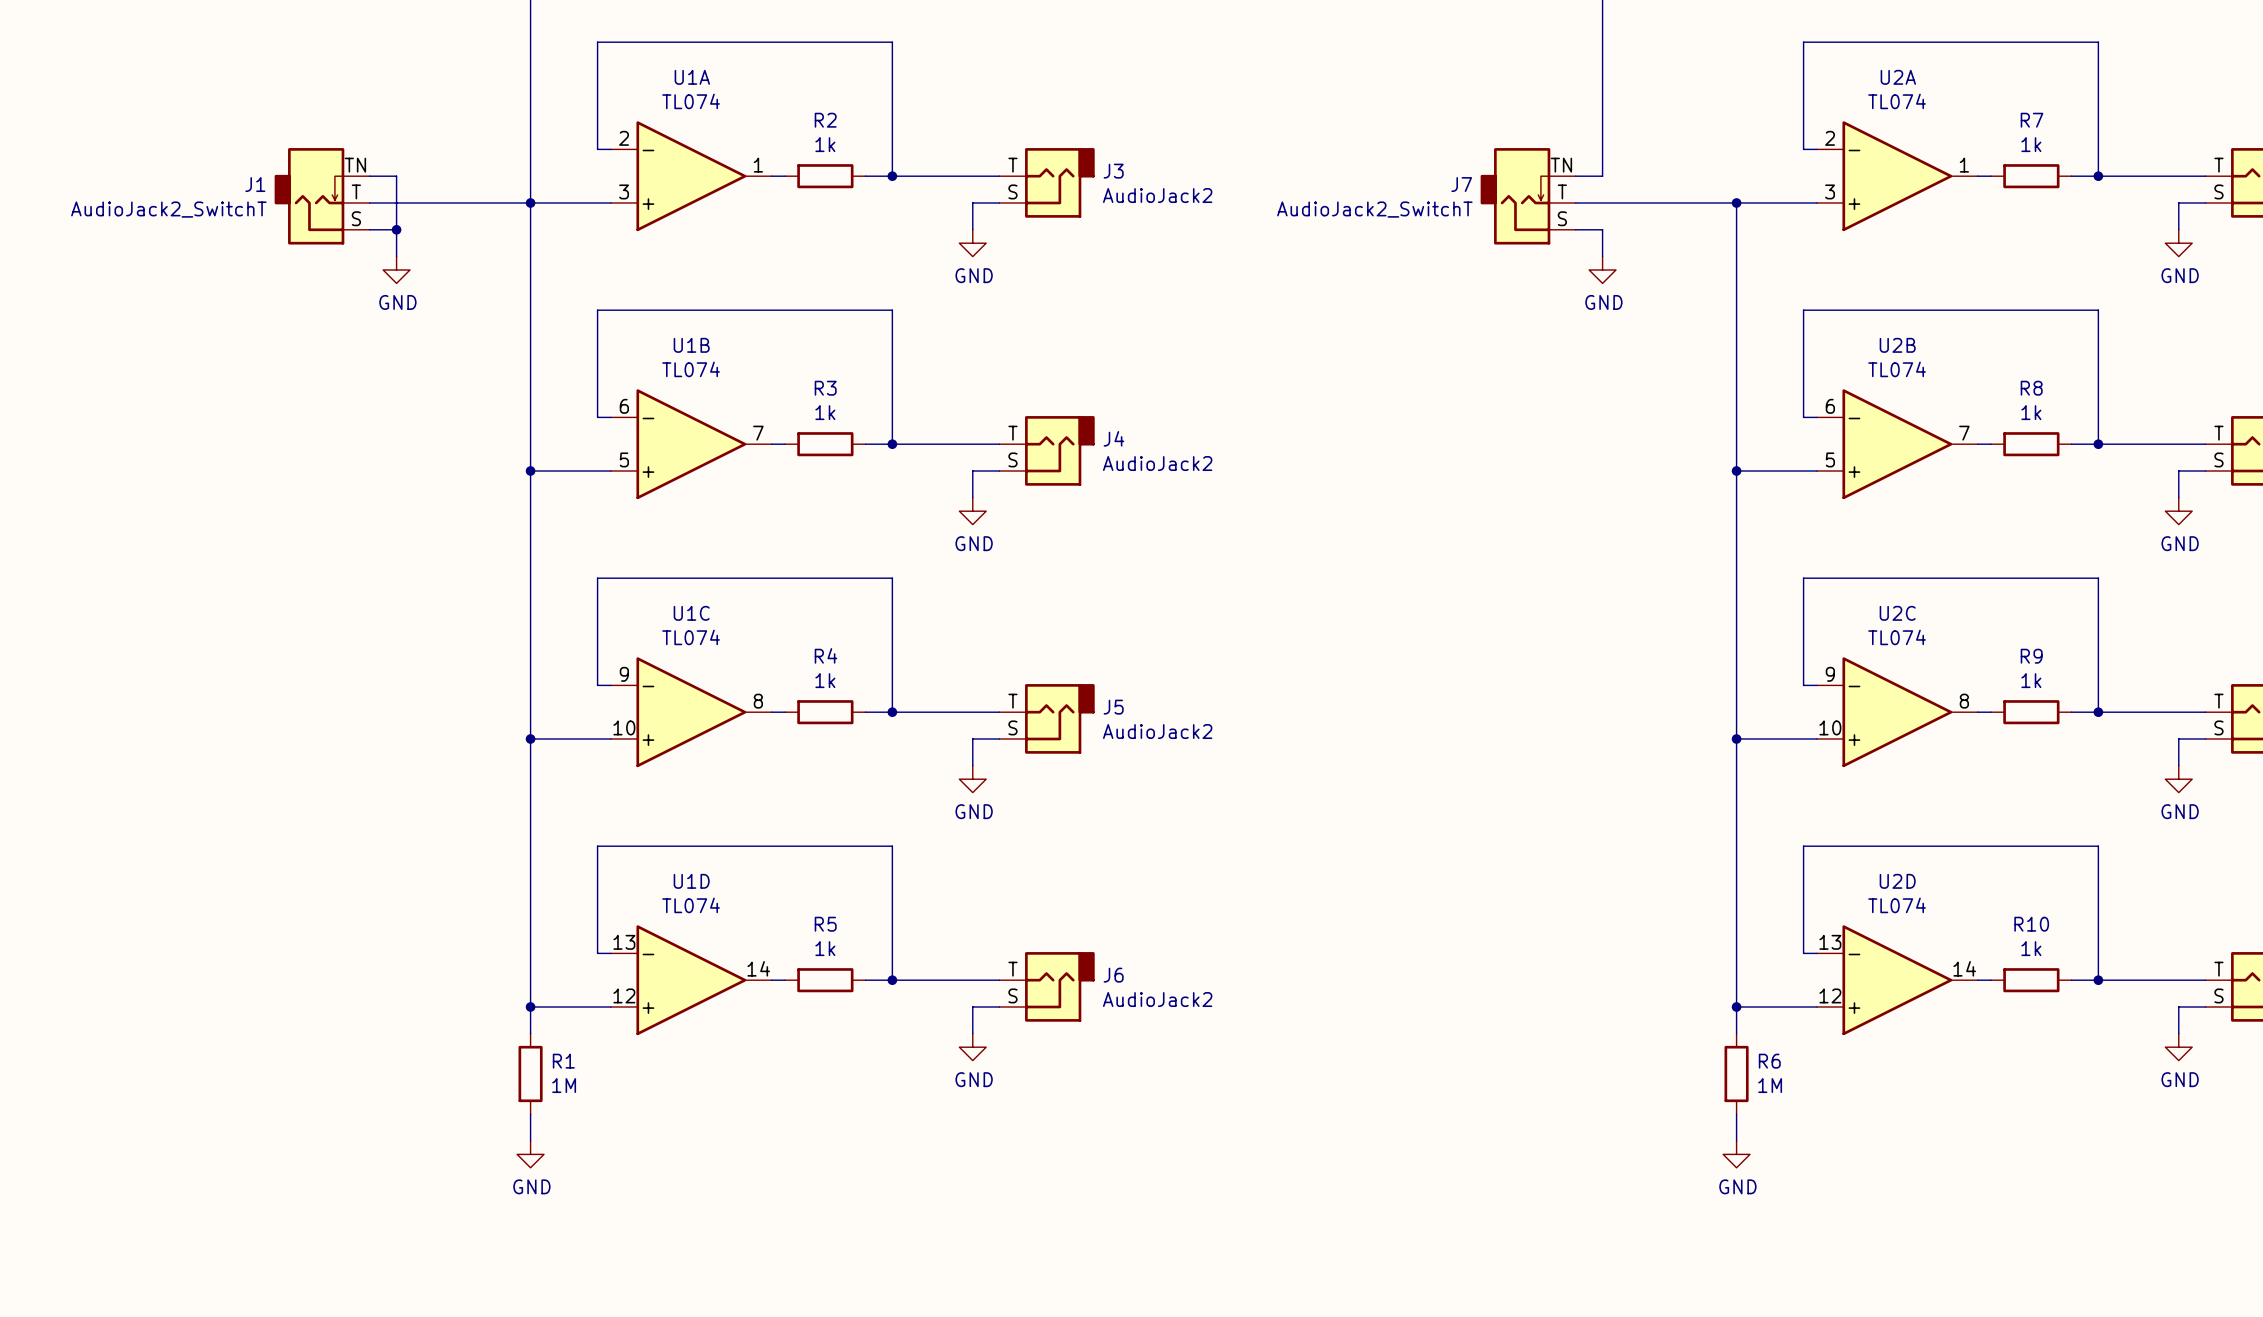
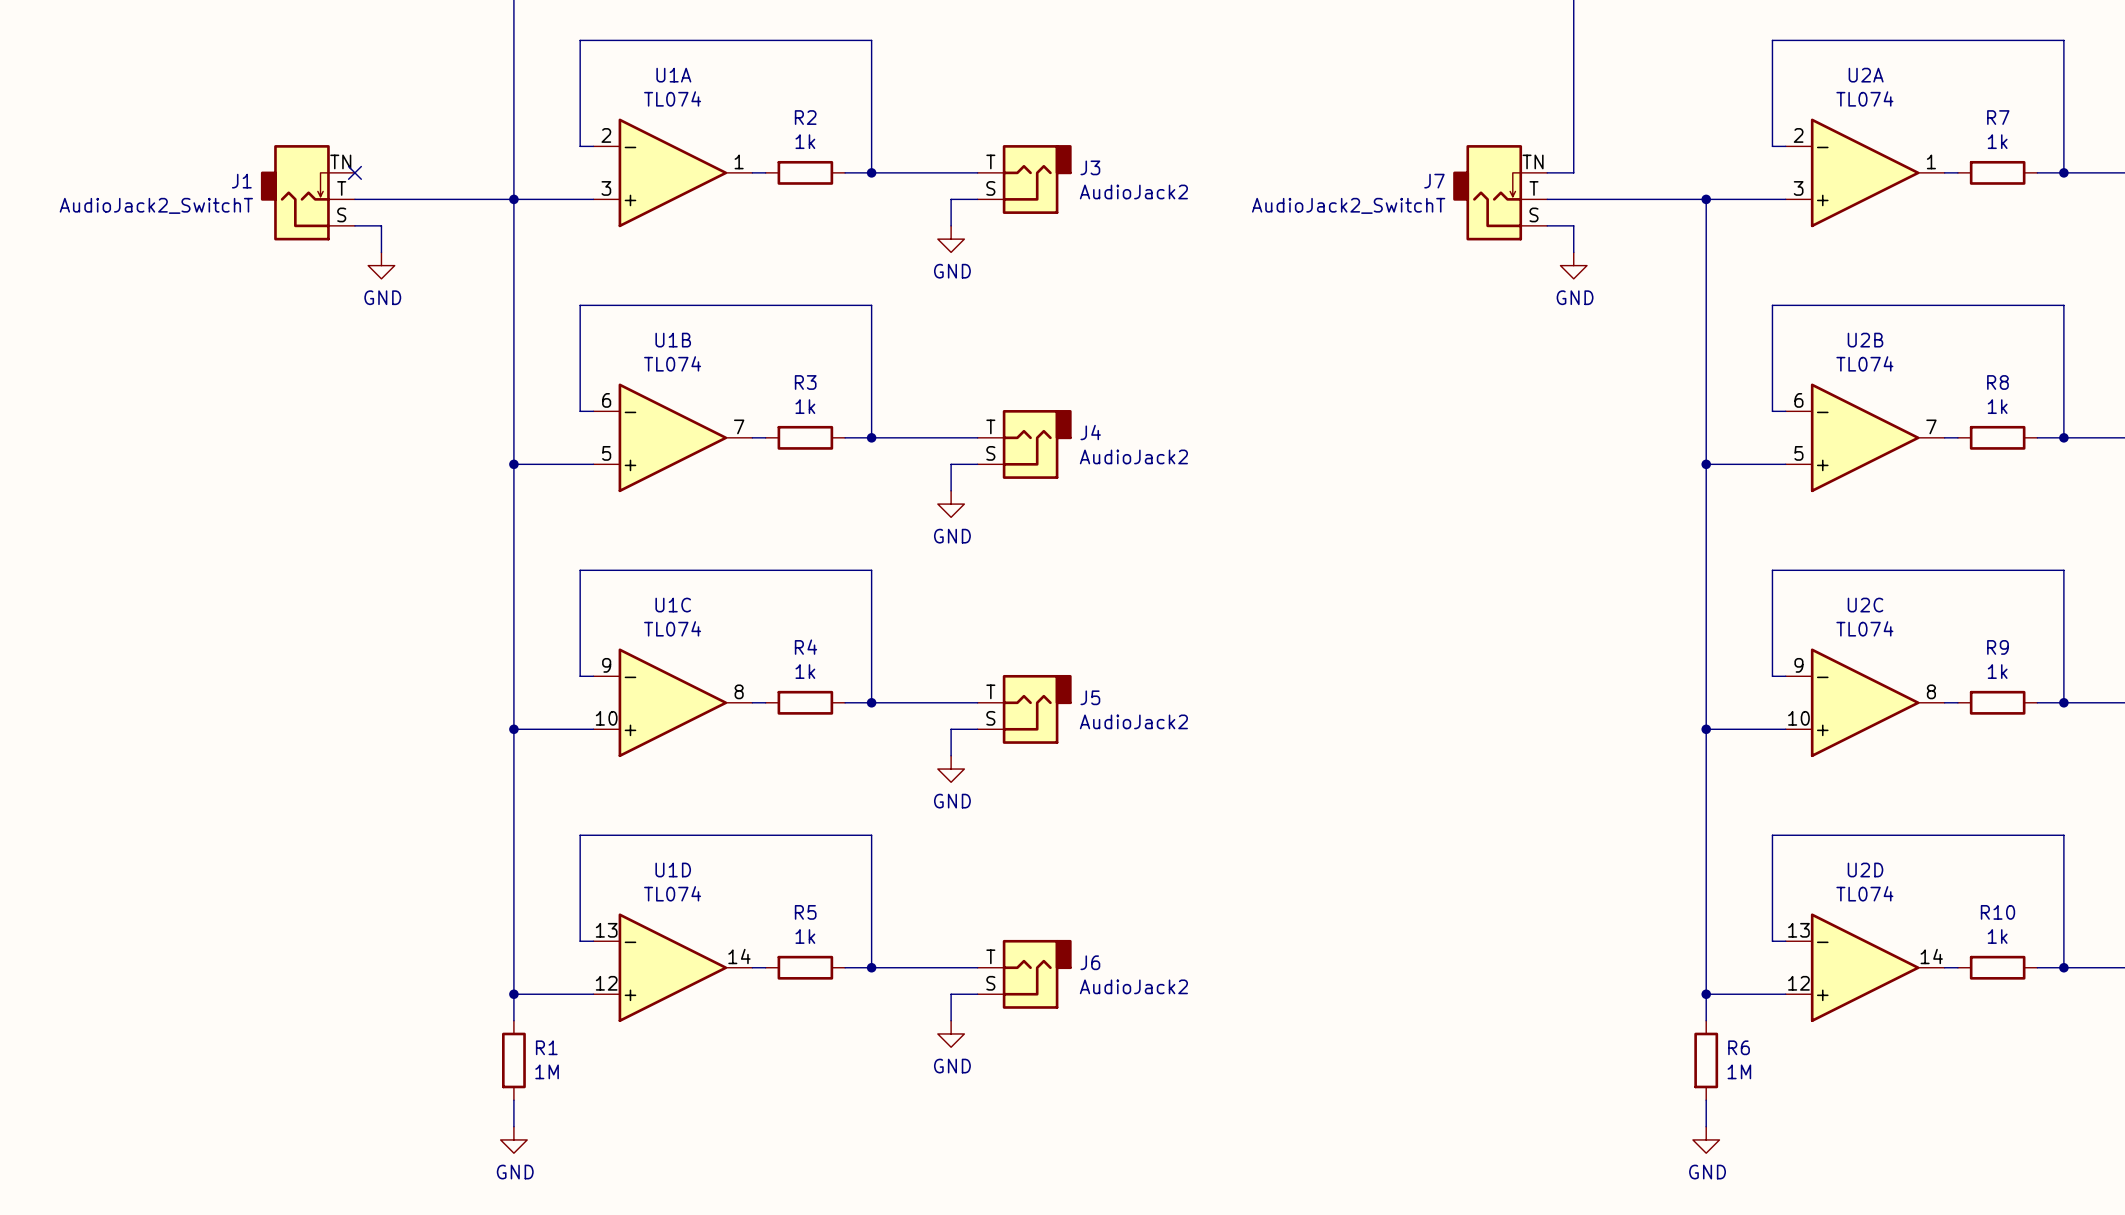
wire: (369, 176) (396, 176) (396, 229) -> none
no-connect mark: none -> (354, 172)
junction: (396, 229) -> none

